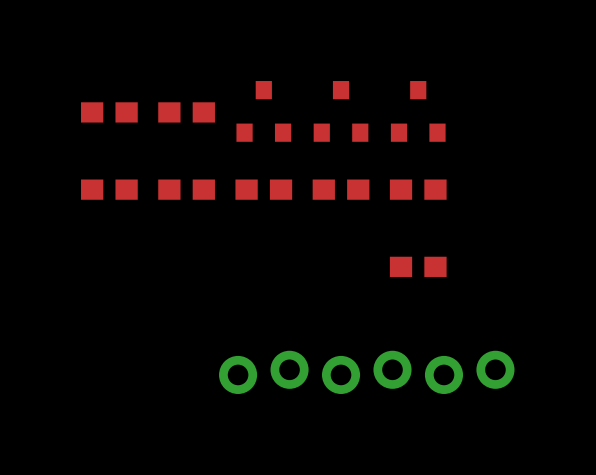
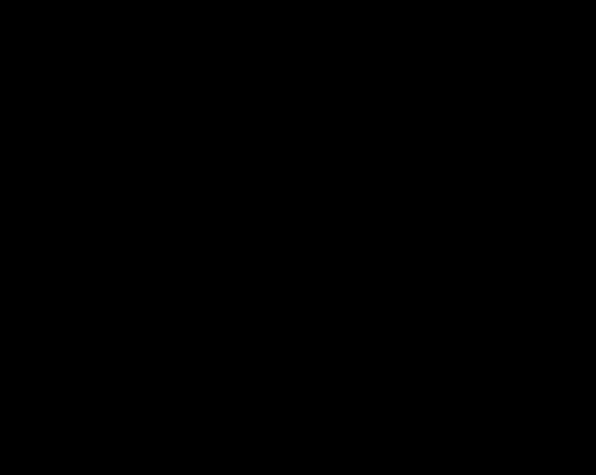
part: (263, 111) -> none
part: (341, 111) -> none
part: (418, 111) -> none
part: (109, 112) -> none
part: (186, 112) -> none
part: (109, 189) -> none
part: (186, 189) -> none
part: (263, 189) -> none
part: (341, 189) -> none
part: (418, 189) -> none
part: (418, 266) -> none
part: (366, 372) -> none

